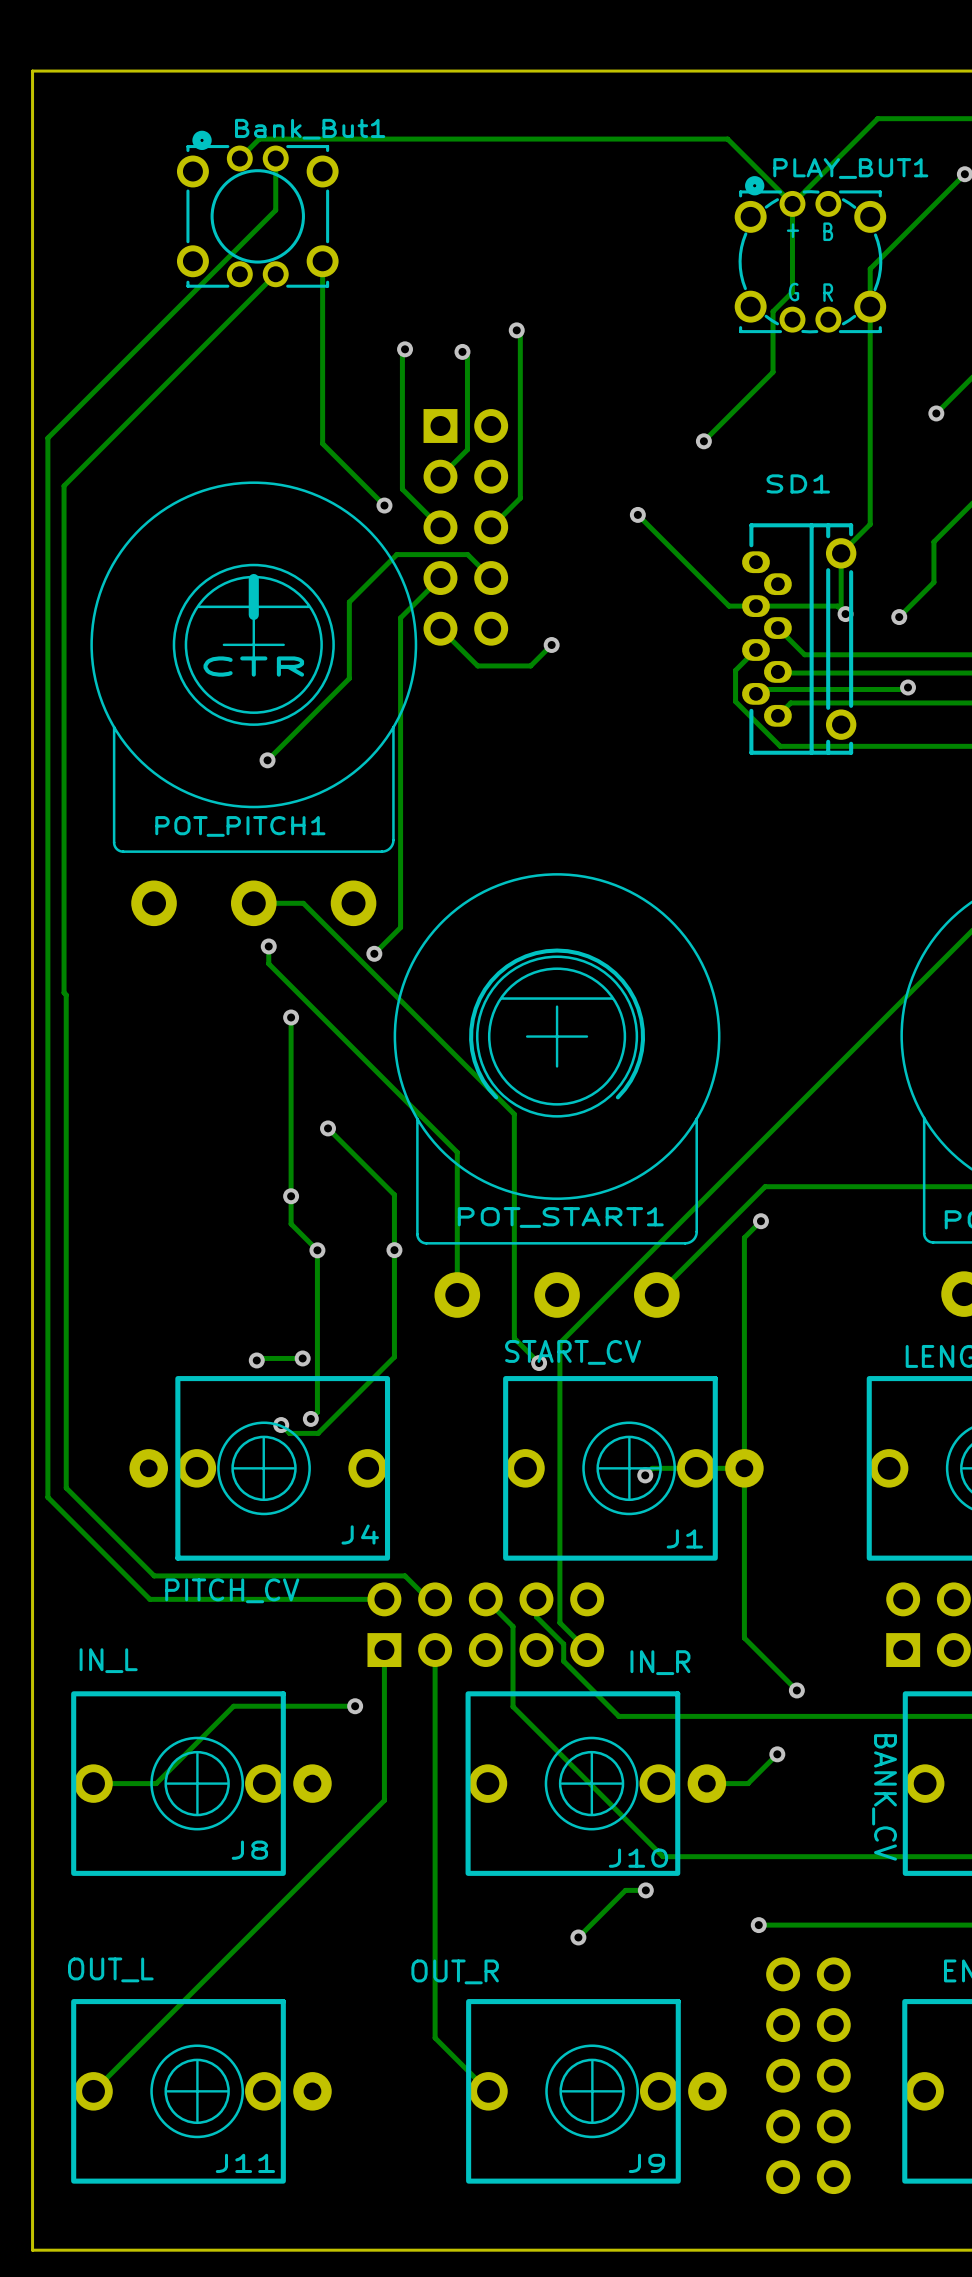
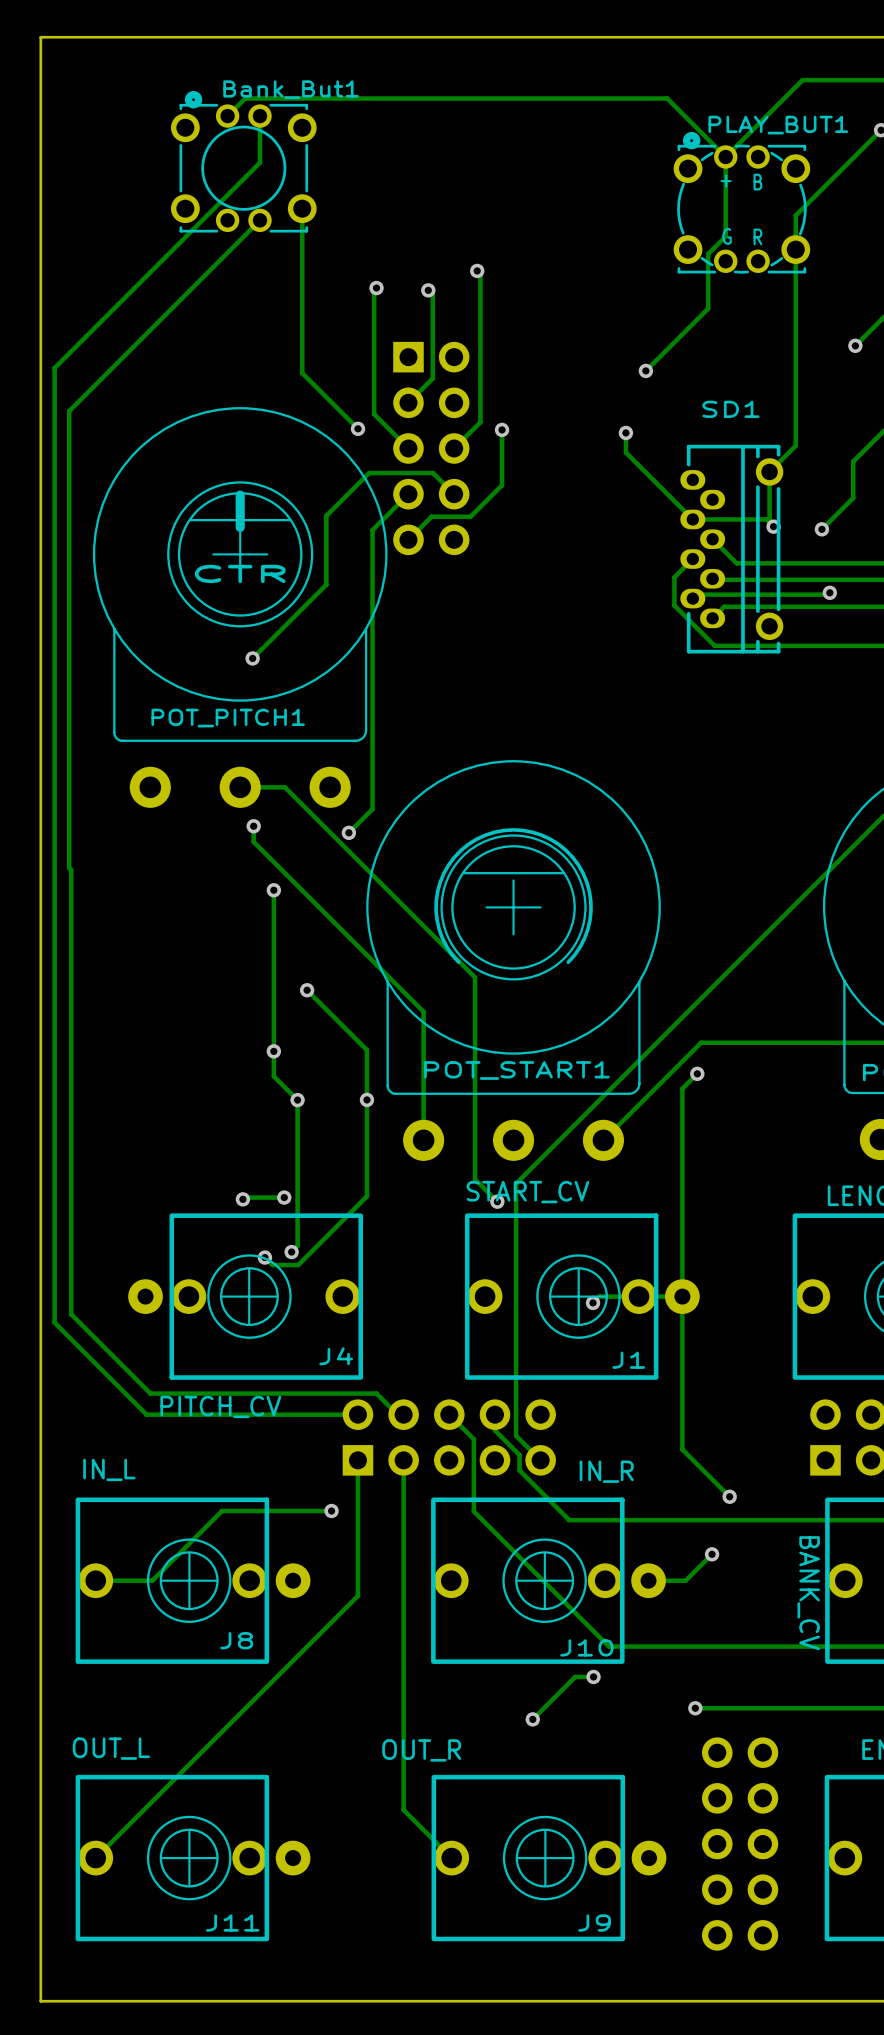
via: none -> (502, 429)
track: (637, 514) (729, 606) (755, 606) -> (625, 432) (625, 452) (692, 519)
via position: (637, 514) -> (625, 432)
track: (440, 628) (477, 665) (530, 665) (551, 645) -> (408, 539) (431, 516) (470, 516) (502, 485) (502, 429)
via: (551, 645) -> none

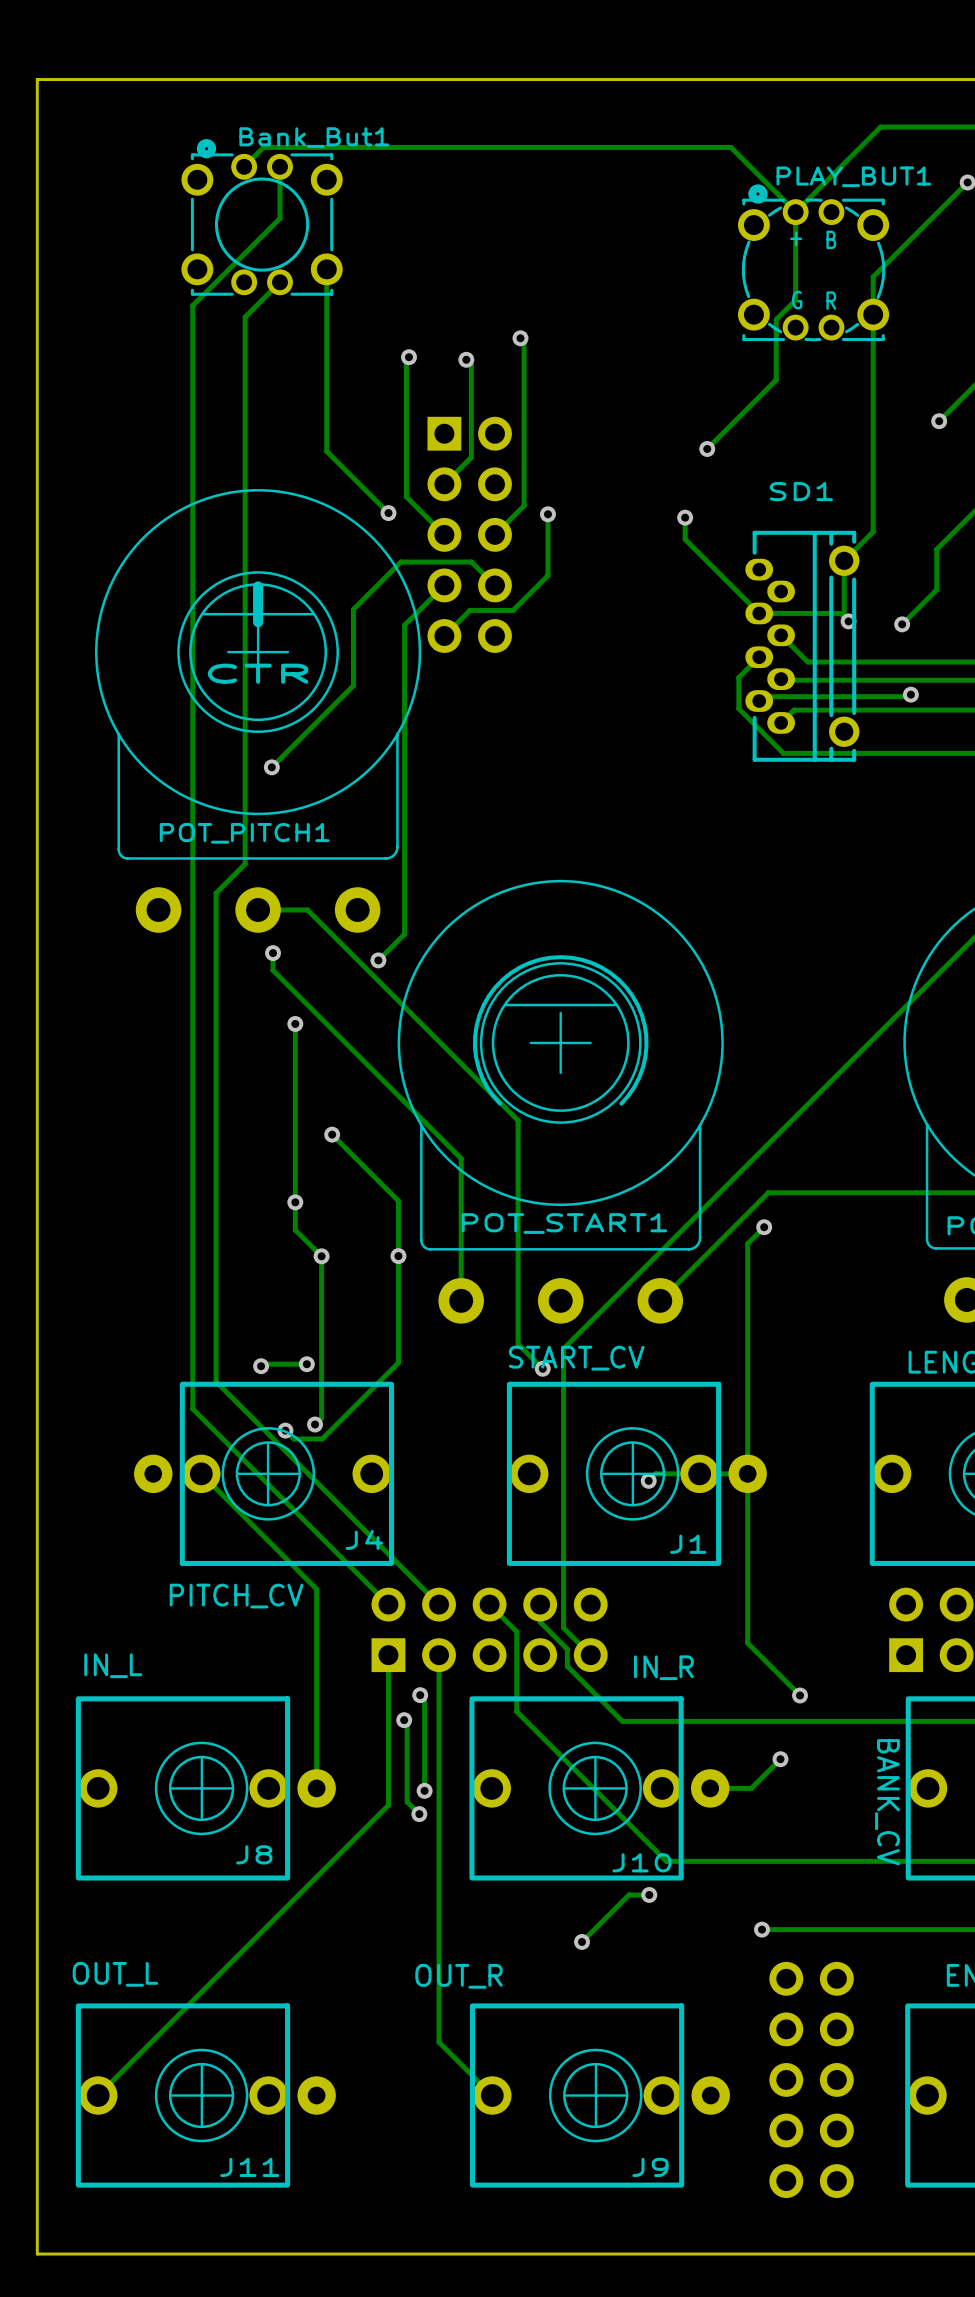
track: (181, 241) (54, 368) (54, 1322) (146, 1414) (357, 1414) -> (192, 305) (192, 1408) (388, 1604)
track: (228, 251) (69, 411) (71, 1314) (150, 1393) (376, 1393) (397, 1414) (403, 1414) -> (245, 317) (245, 864) (216, 893) (216, 1381) (439, 1604)
track: none -> (201, 1473) (316, 1589) (316, 1788)
track: none -> (420, 1695) (424, 1699) (424, 1790)
via: none -> (420, 1695)
track: (331, 1510) (222, 1510) (152, 1580) (95, 1580) -> none
via: (331, 1510) -> none
track: none -> (404, 1720) (407, 1723) (407, 1801) (419, 1814)
via: none -> (404, 1720)
via: none -> (424, 1790)
via: none -> (419, 1814)

